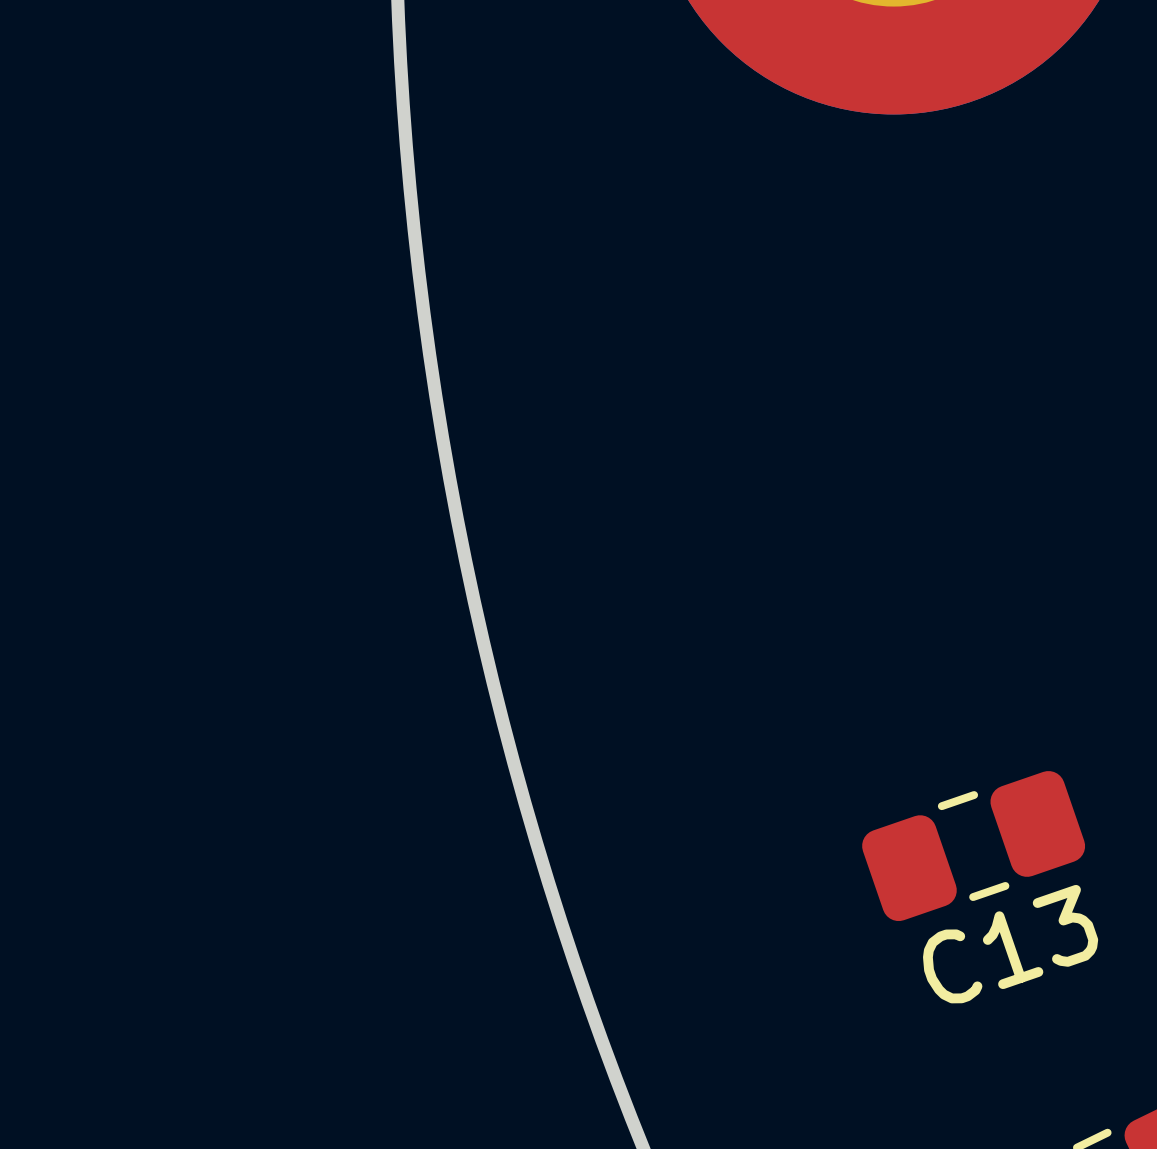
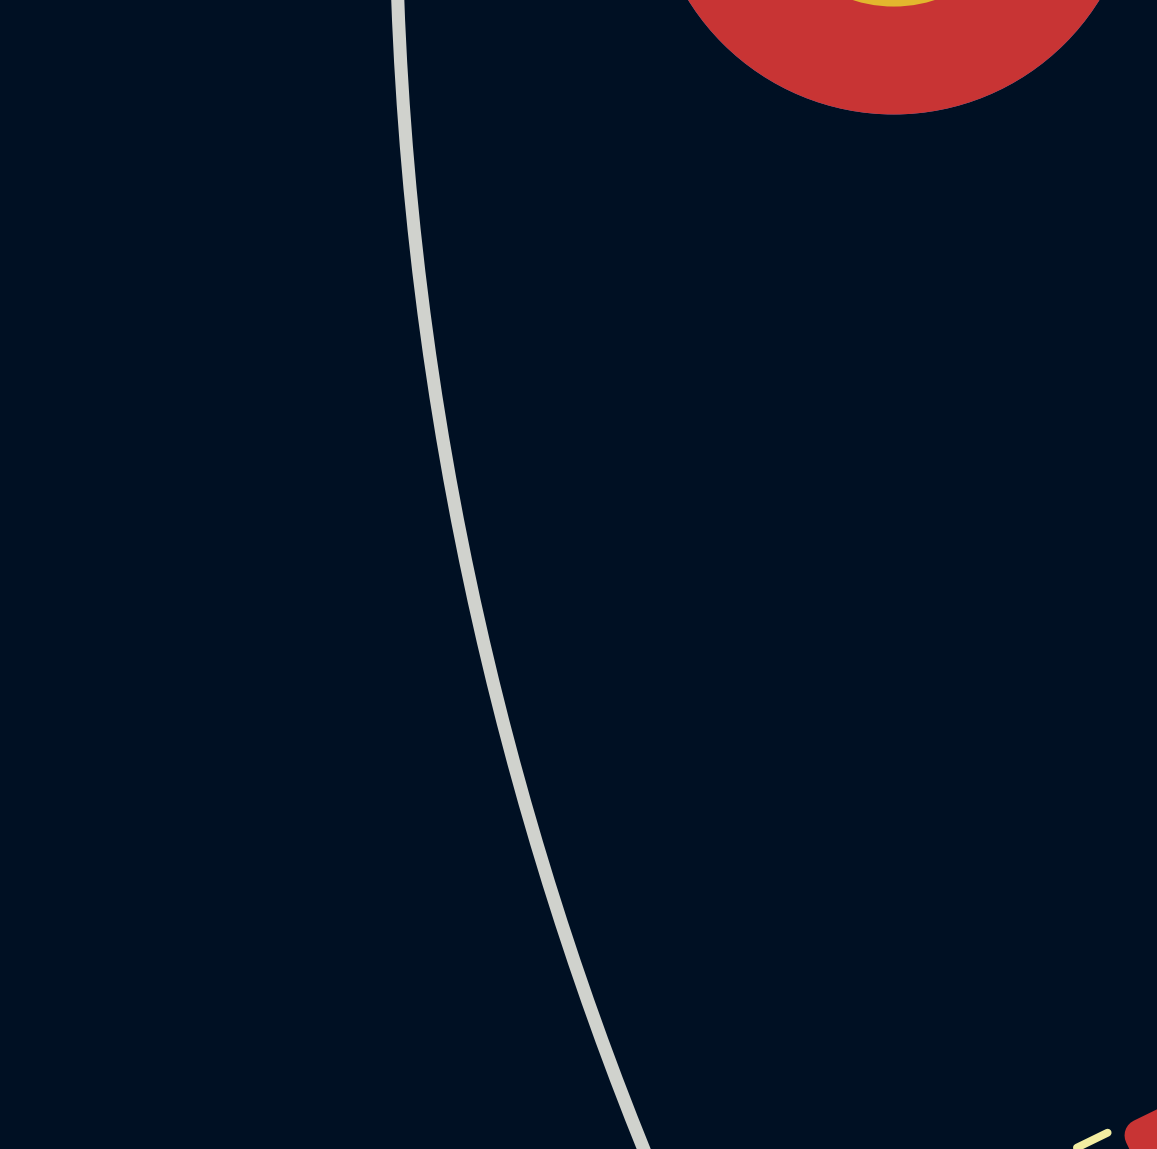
C13: (973, 846) -> none

